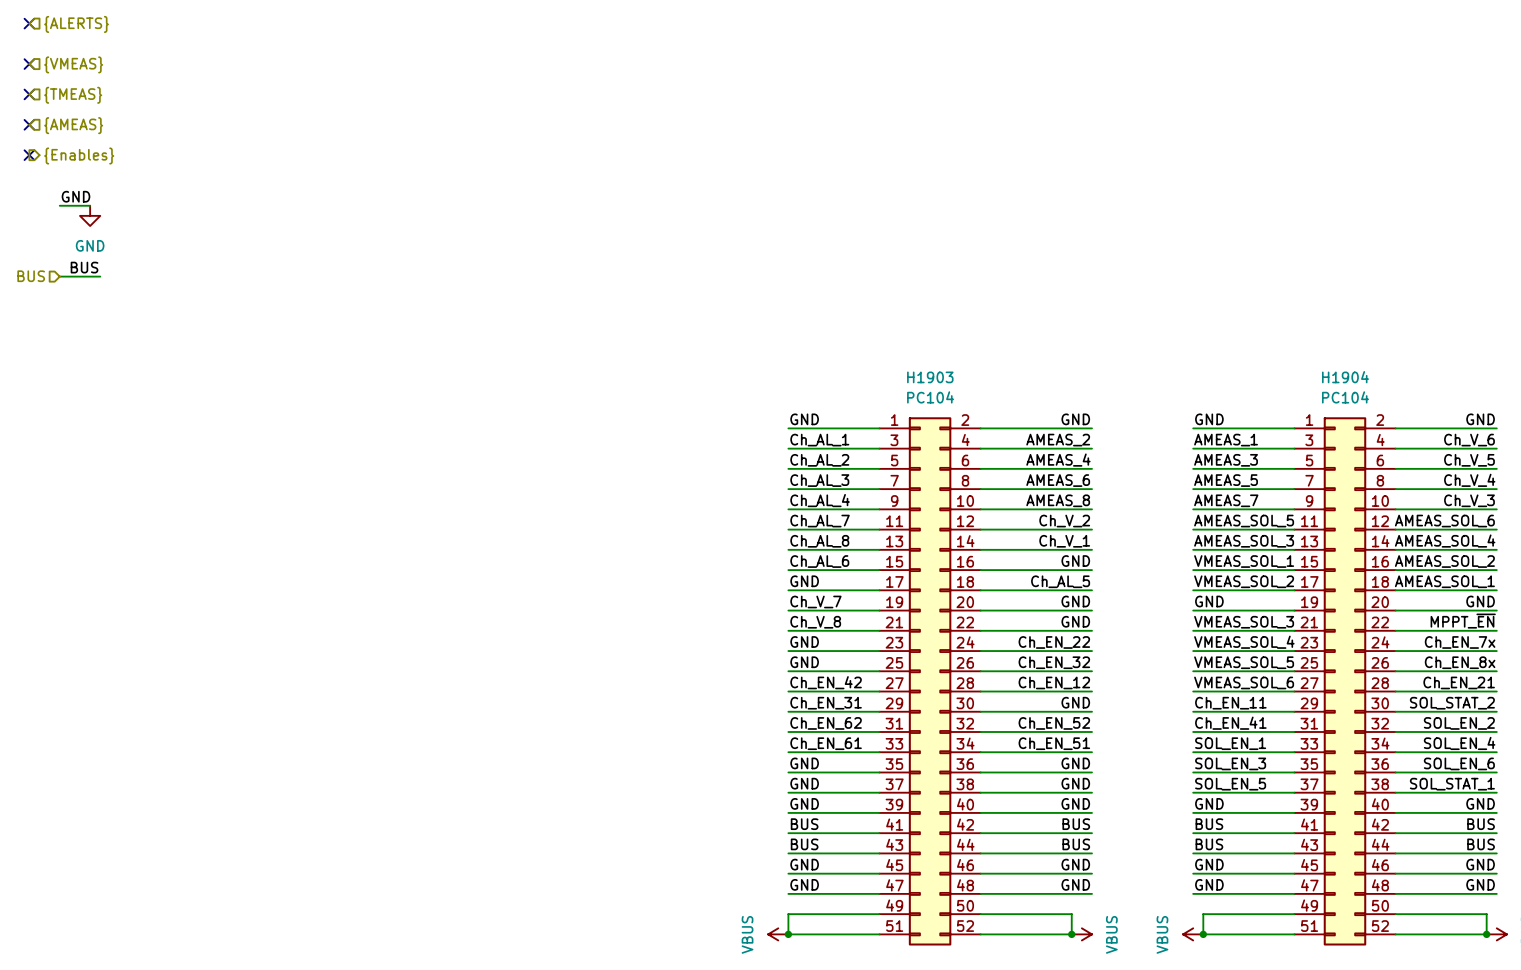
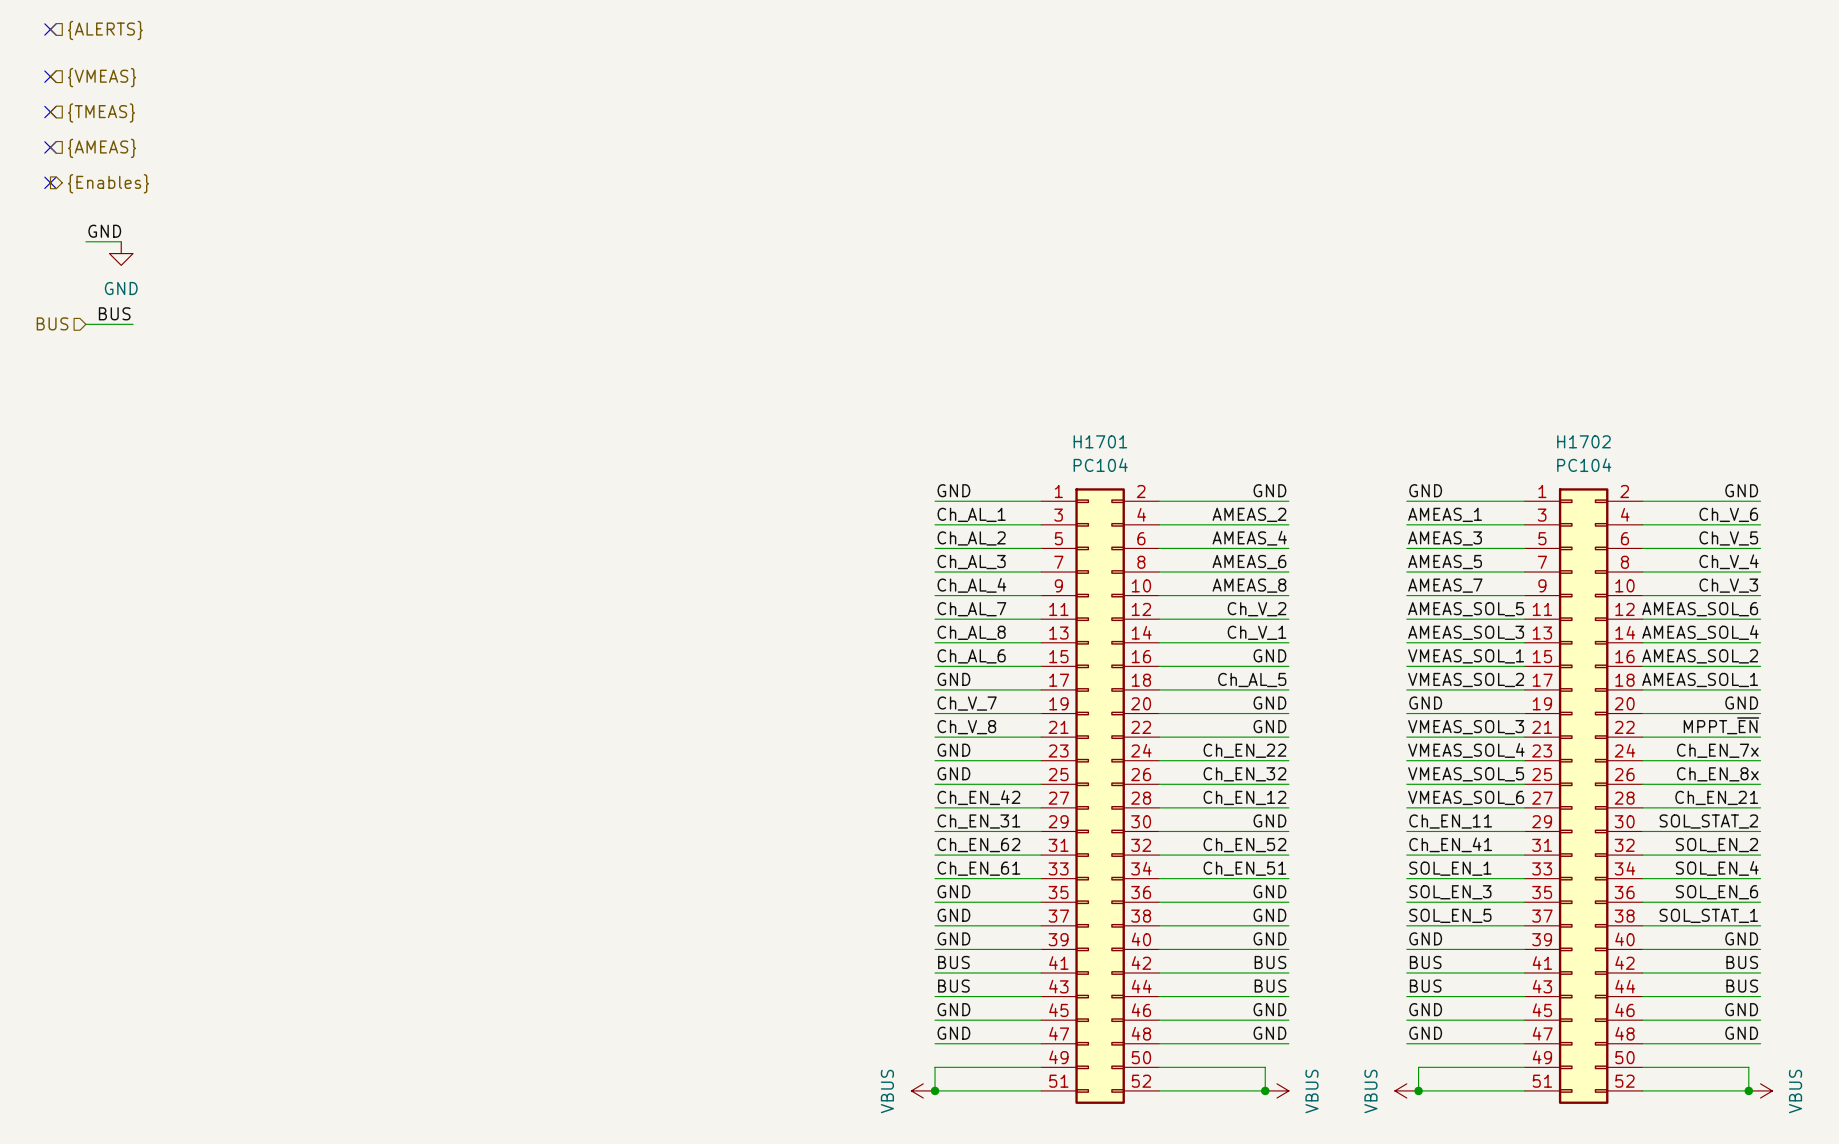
H1903 name: H1903 (930, 377) -> H1701 (1100, 441)
H1904 name: H1904 (1345, 377) -> H1702 (1583, 441)

